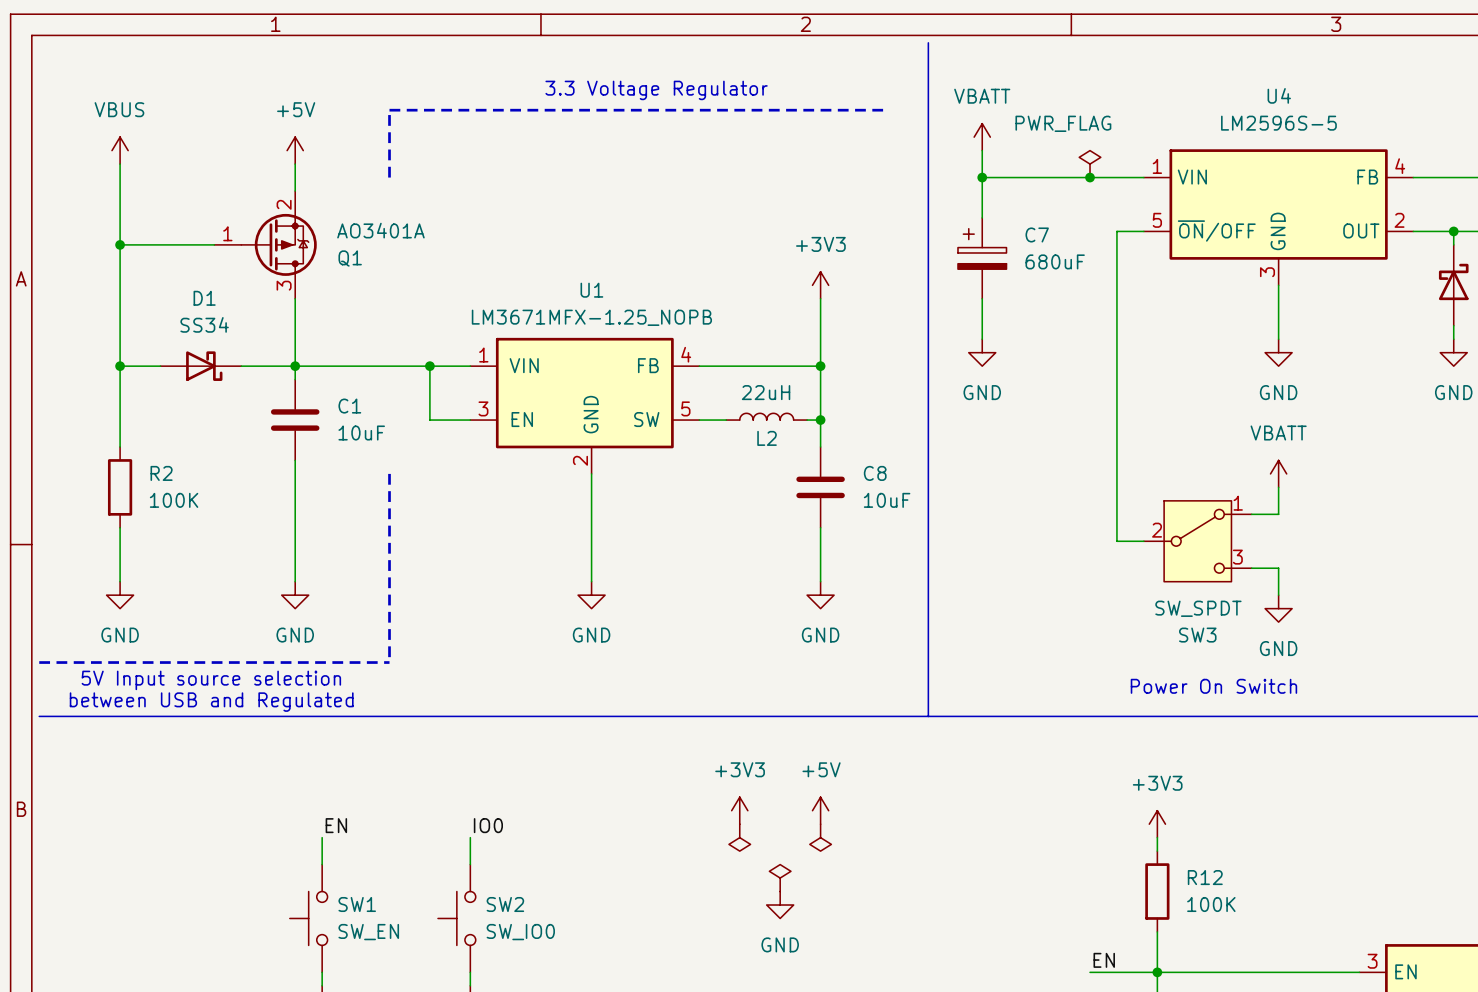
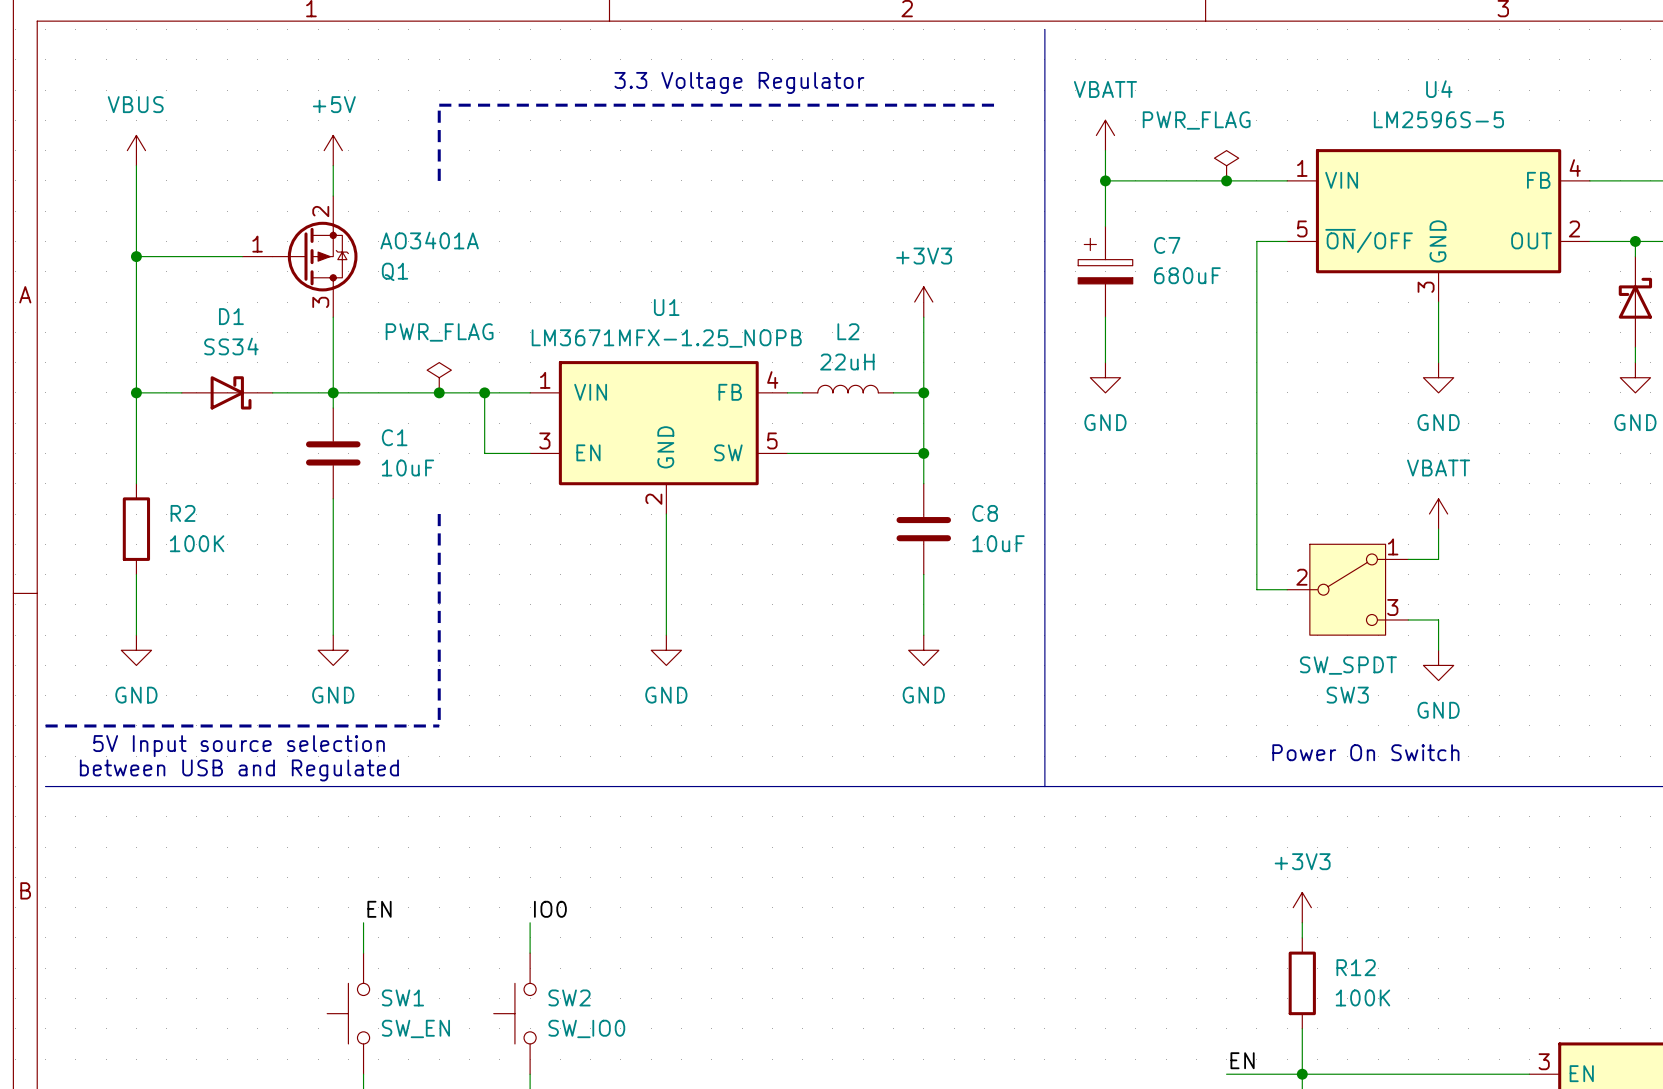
power symbol: none -> PWR_FLAG (439, 377)
junction: none -> (439, 392)
wire: (712, 366) (793, 366) -> (817, 453) (908, 453)
L2 position: (766, 416) -> (848, 389)
L2 name position: L2 (767, 438) -> L2 (848, 331)
power symbol: +3V3 (739, 810) -> none
power symbol: +5V (820, 810) -> none
power symbol: (739, 837) -> none
power symbol: (820, 837) -> none
power symbol: (780, 878) -> none
power symbol: GND (780, 905) -> none

